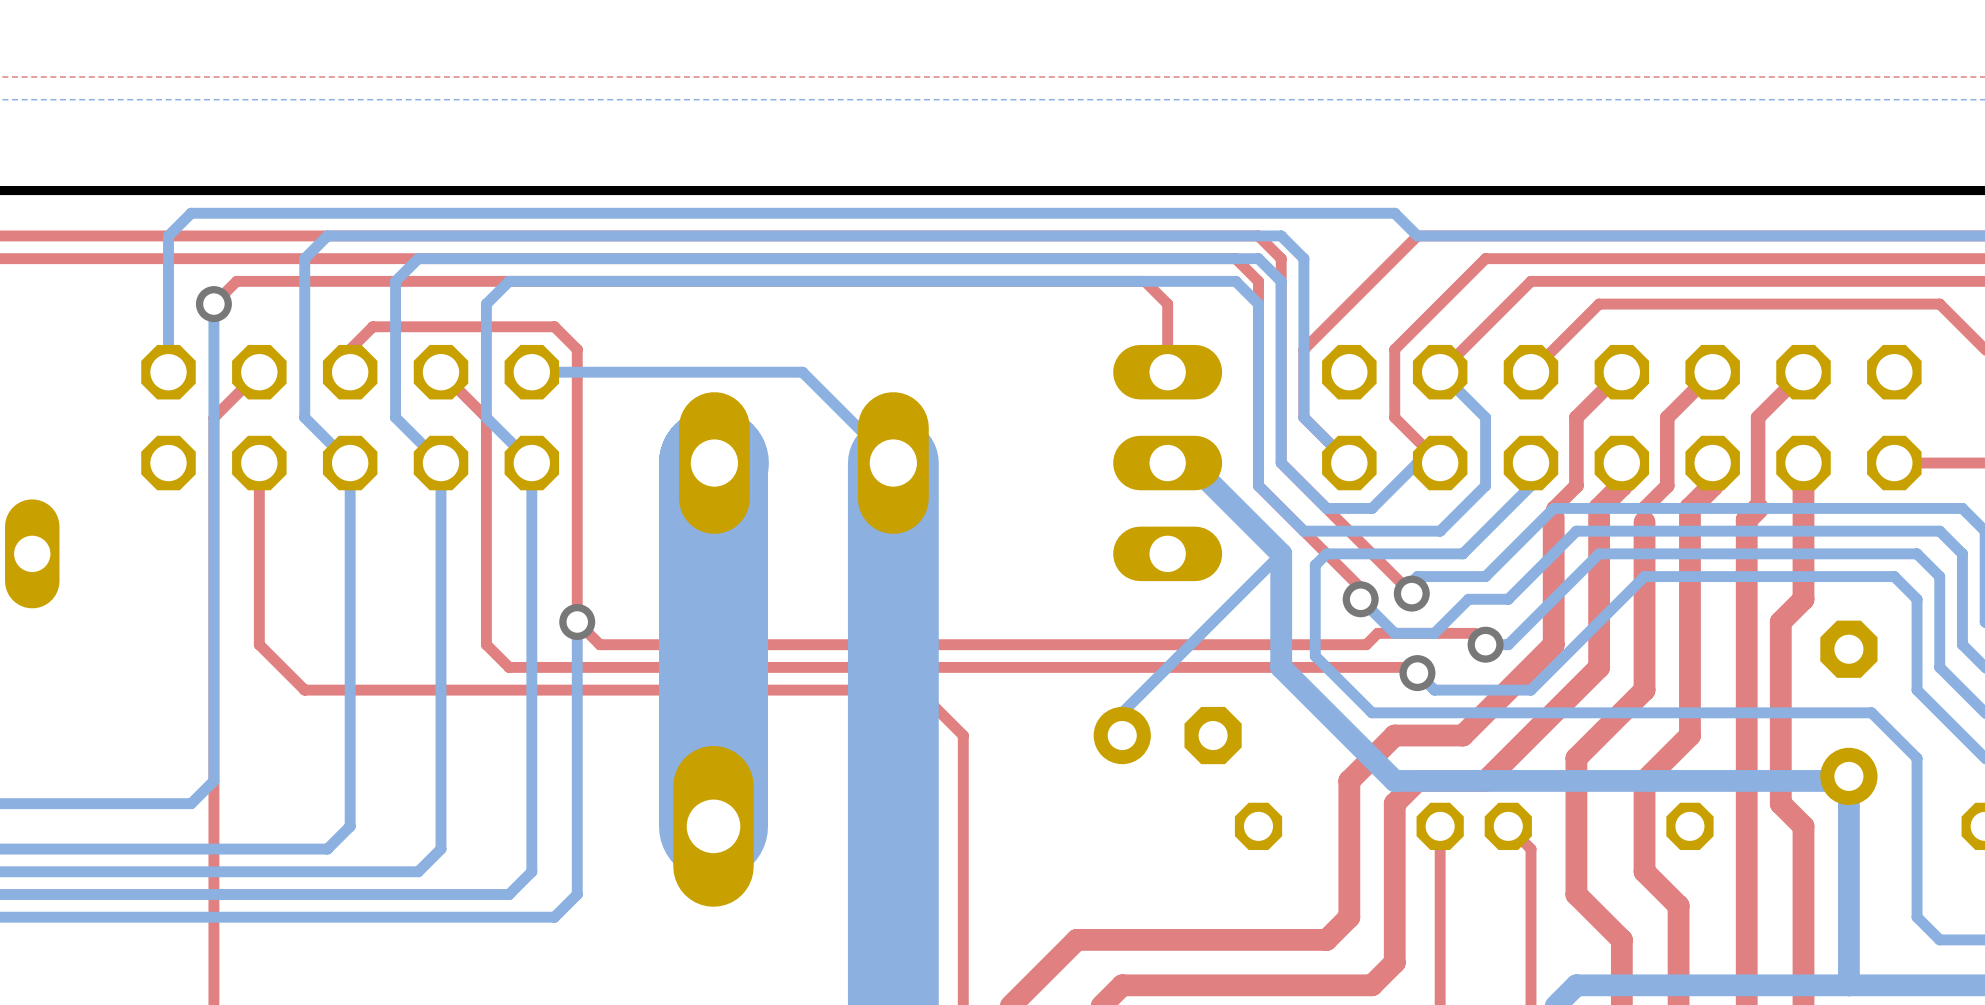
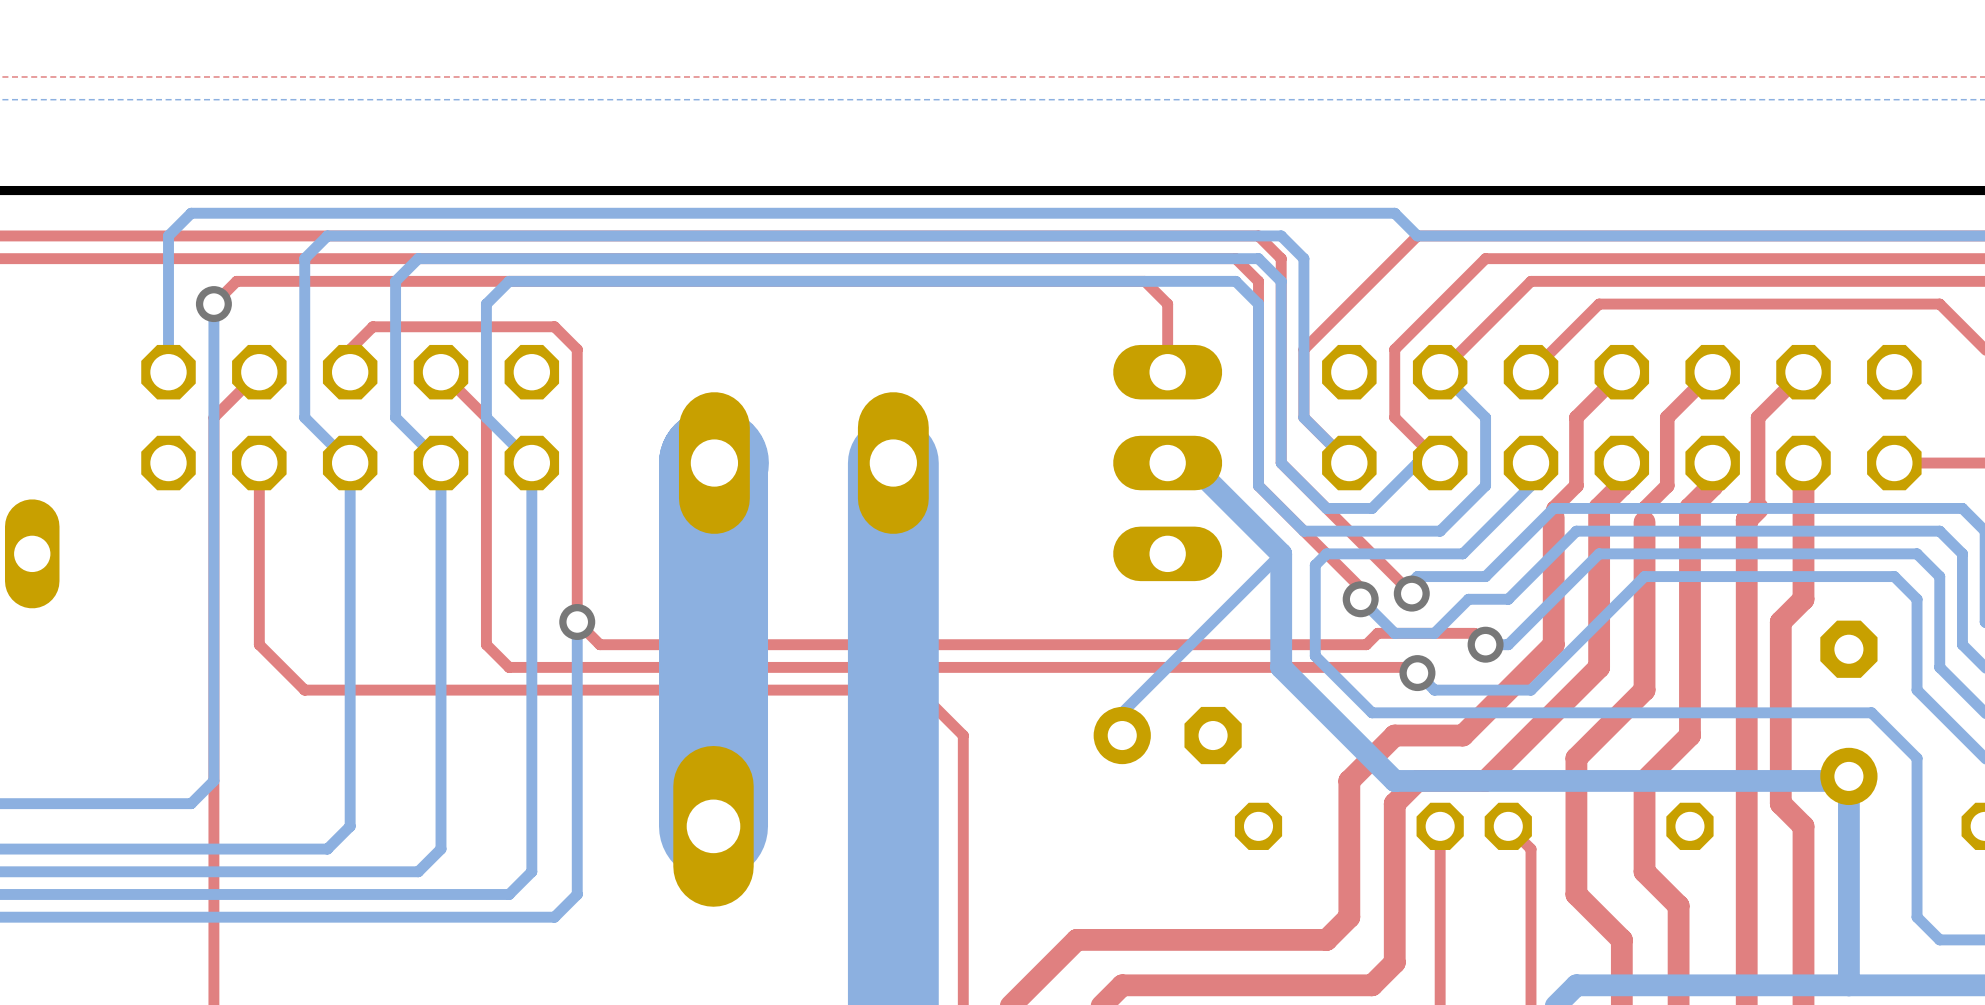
bottom track: (531, 372) (802, 372) (893, 463) -> none

